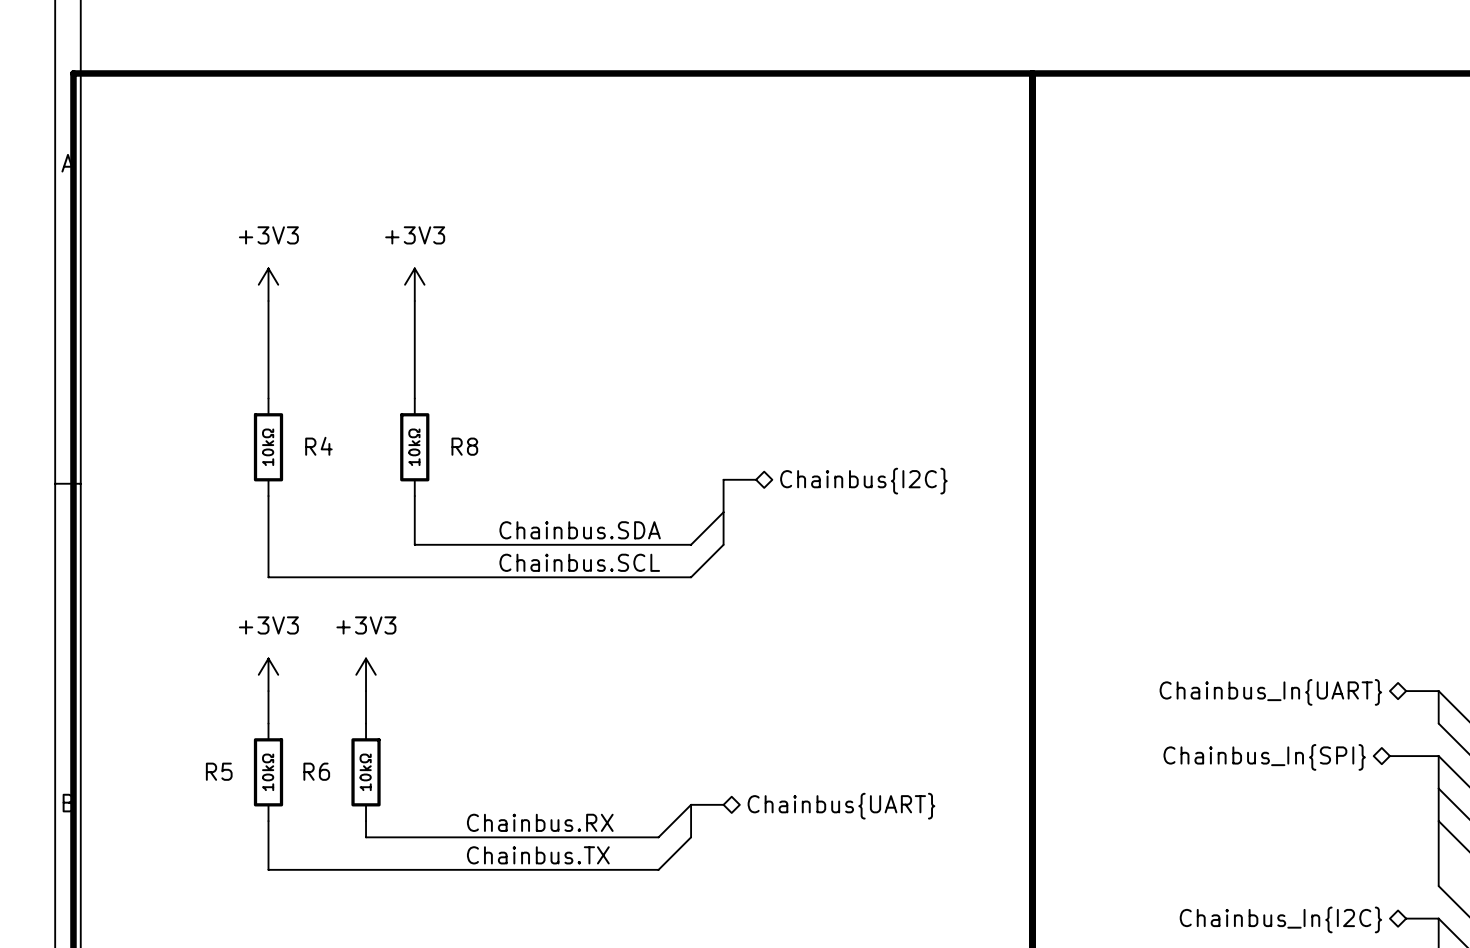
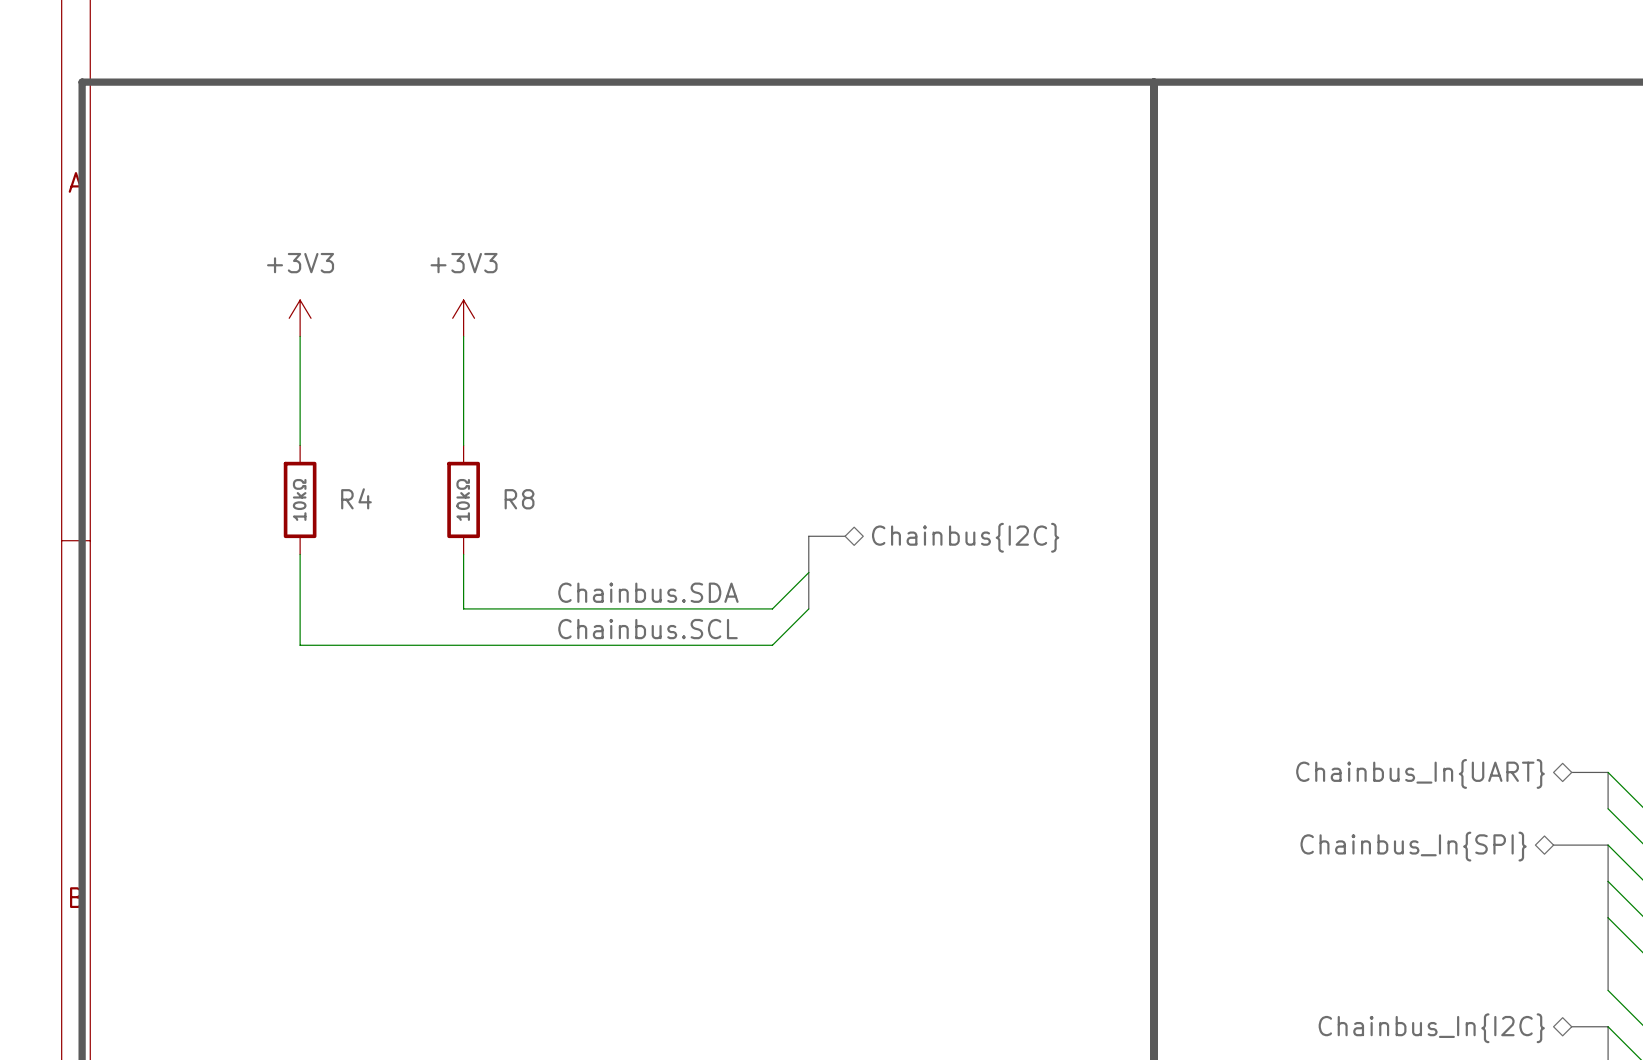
power symbol: +3V3 (268, 674) -> none
power symbol: +3V3 (366, 674) -> none
wire: (268, 691) (268, 723) -> none
wire: (366, 691) (366, 723) -> none
R5: 10kΩ (268, 772) -> none
R6: 10kΩ (366, 772) -> none
wire: (691, 804) (658, 837) (366, 837) (366, 821) -> none
bus: (723, 804) (691, 804) (691, 837) -> none
hierarchical label: Chainbus{UART} (841, 806) -> none
wire: (268, 821) (268, 869) (658, 869) (691, 837) -> none
label: Chainbus.RX (540, 822) -> none
label: Chainbus.TX (538, 855) -> none

